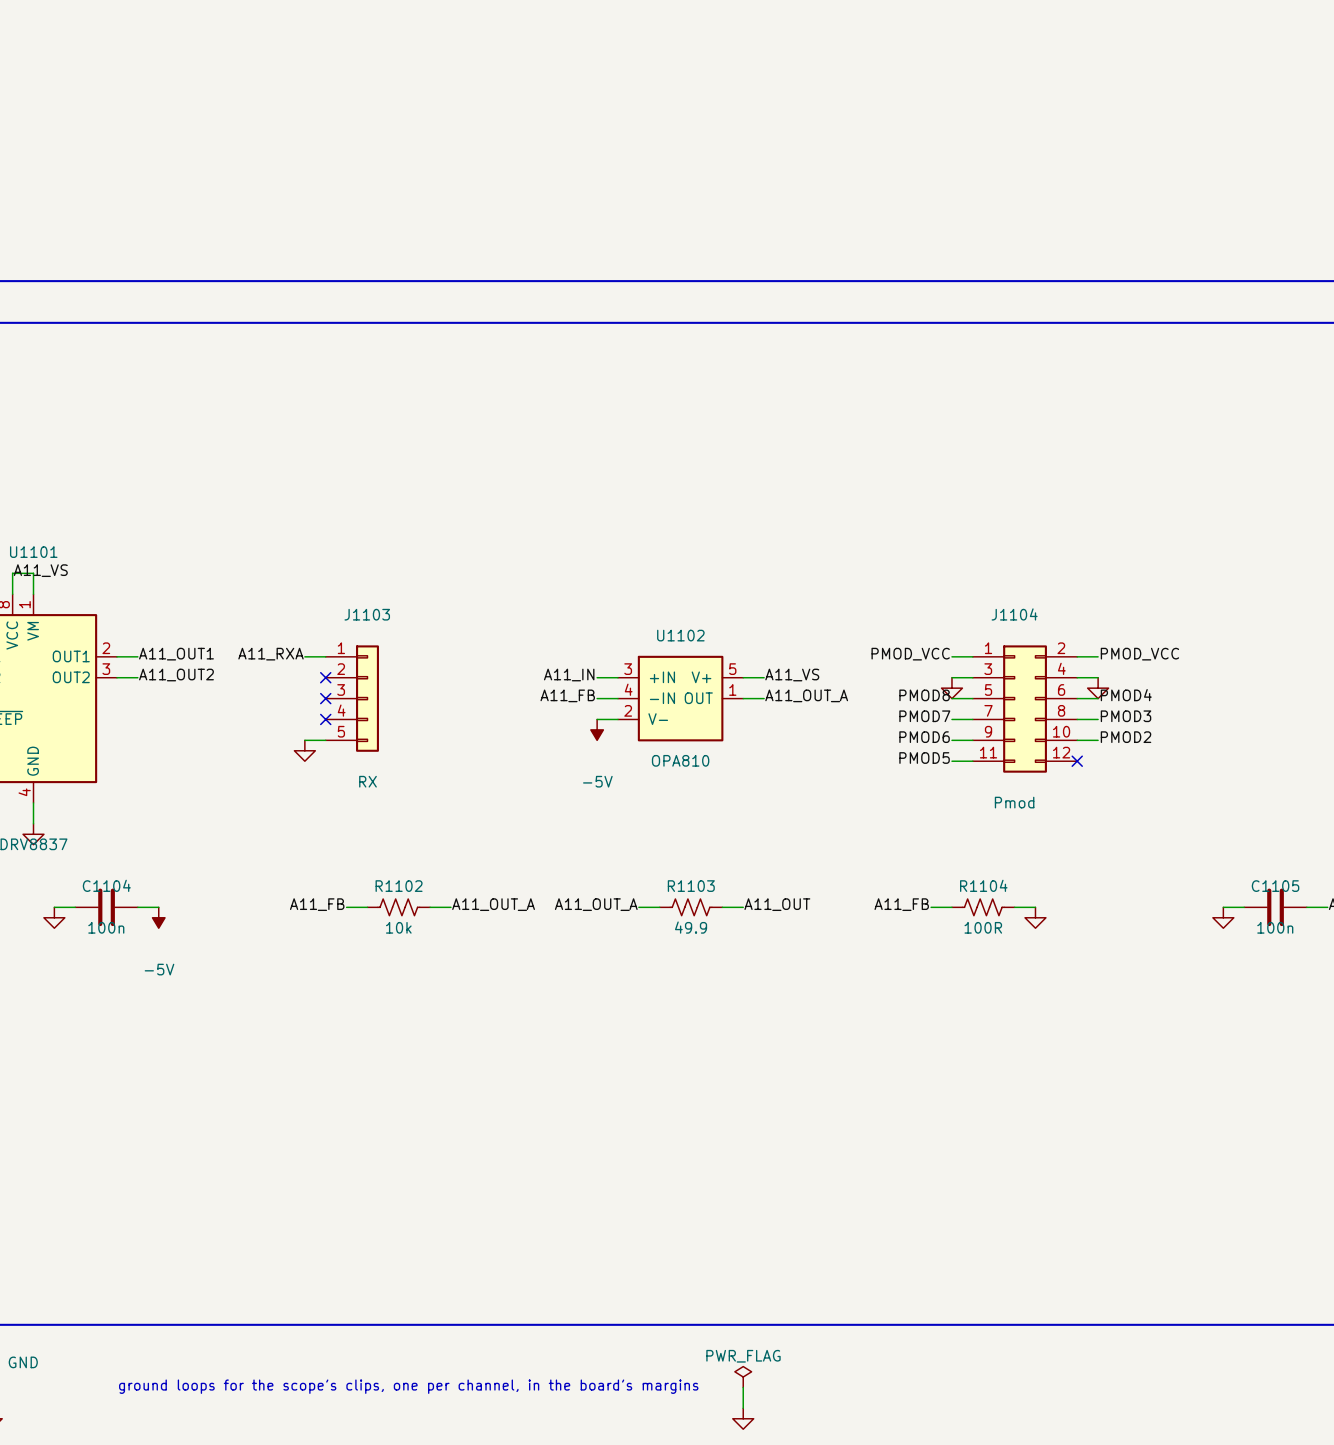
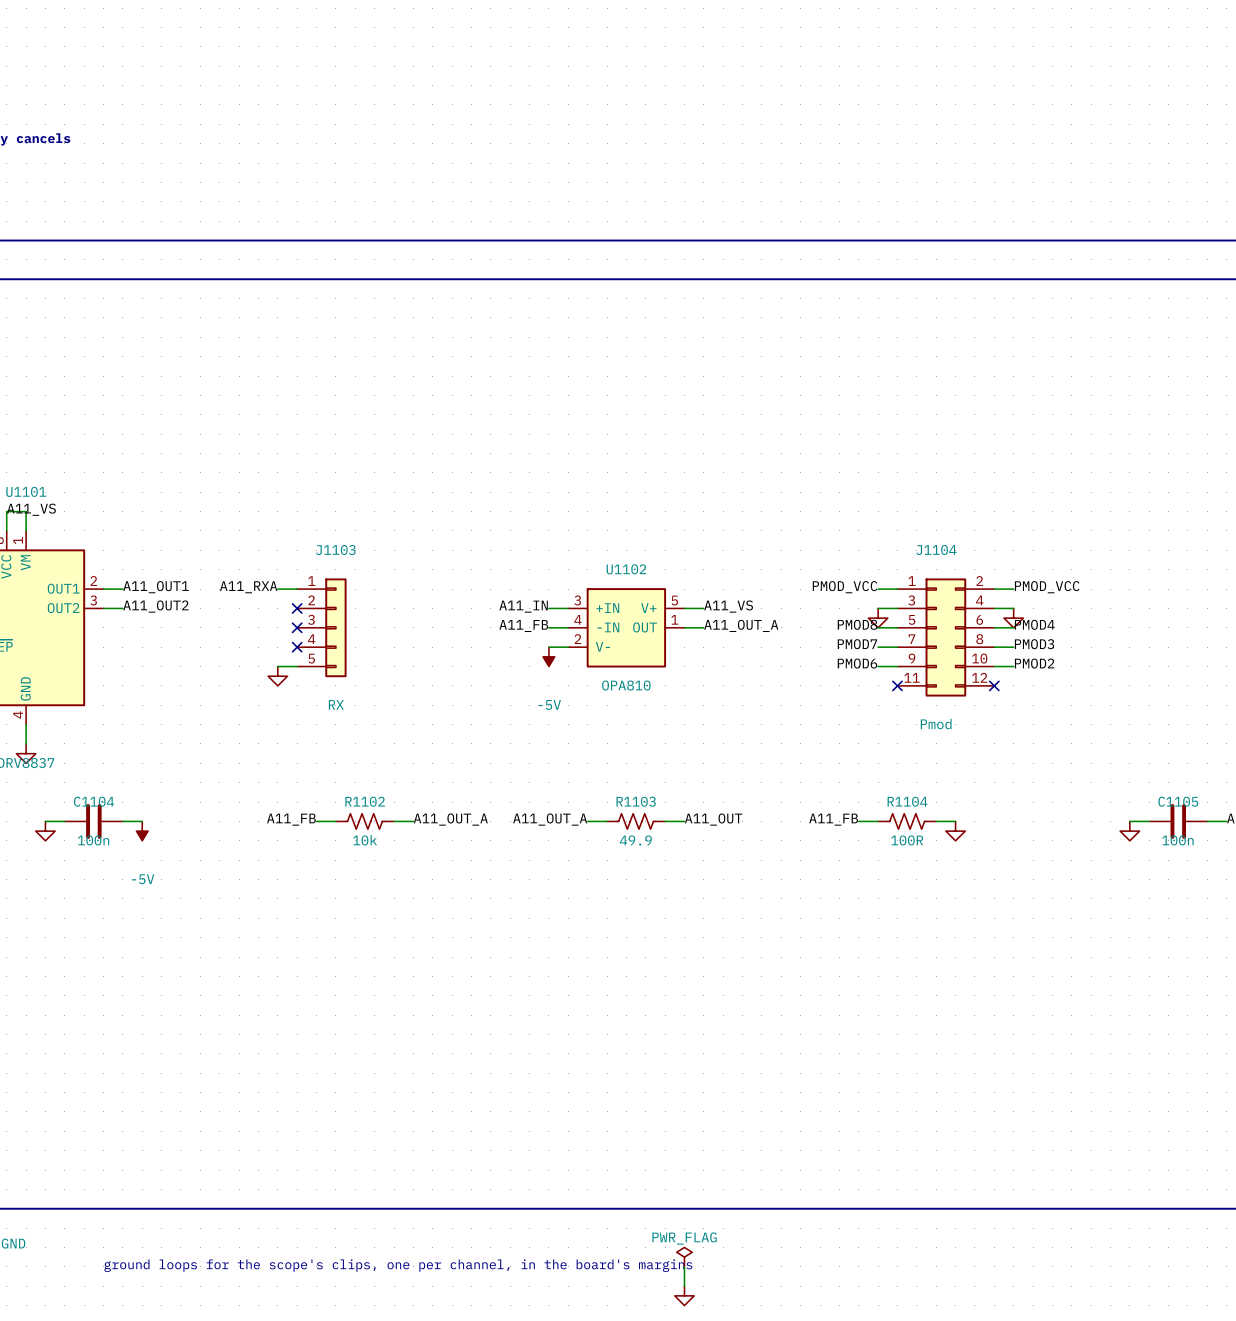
label: PMOD5 (924, 758) -> none
wire: (951, 761) (972, 761) -> none
no-connect mark: none -> (897, 685)

